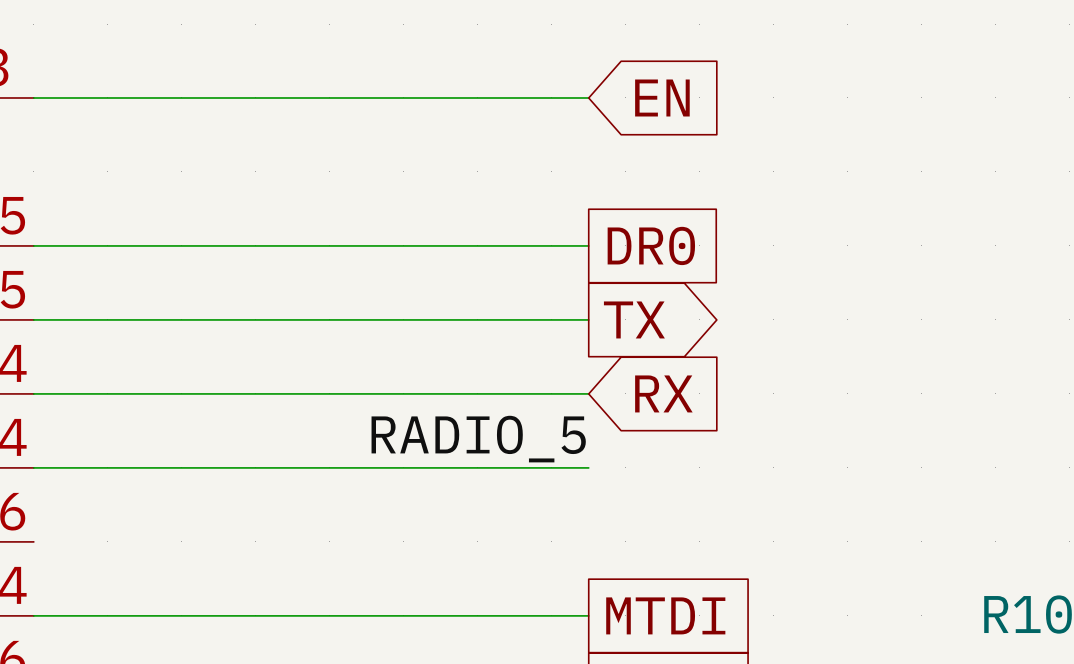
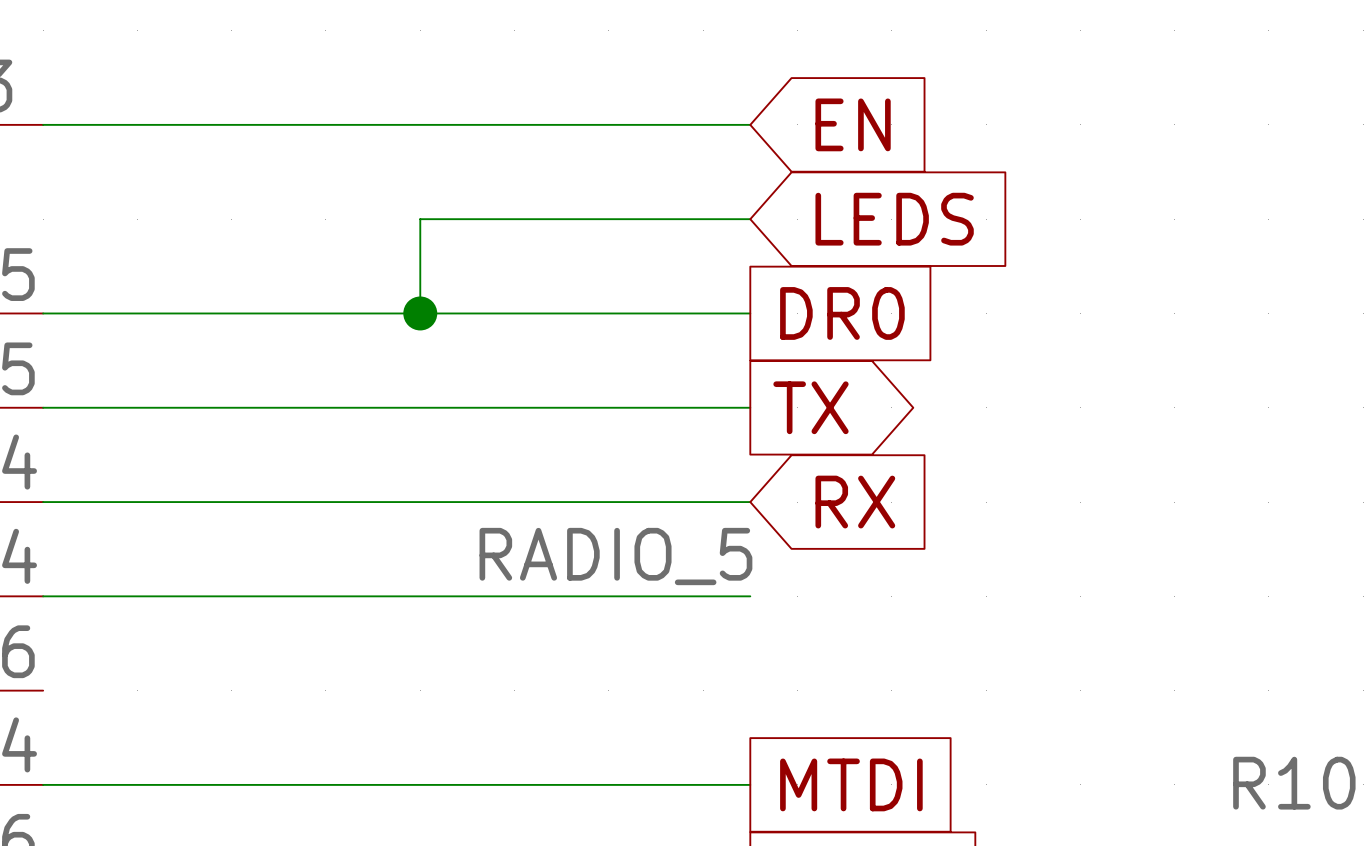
wire: none -> (750, 219) (420, 219) (420, 313)
global label: none -> LEDS (894, 219)
junction: none -> (420, 313)

